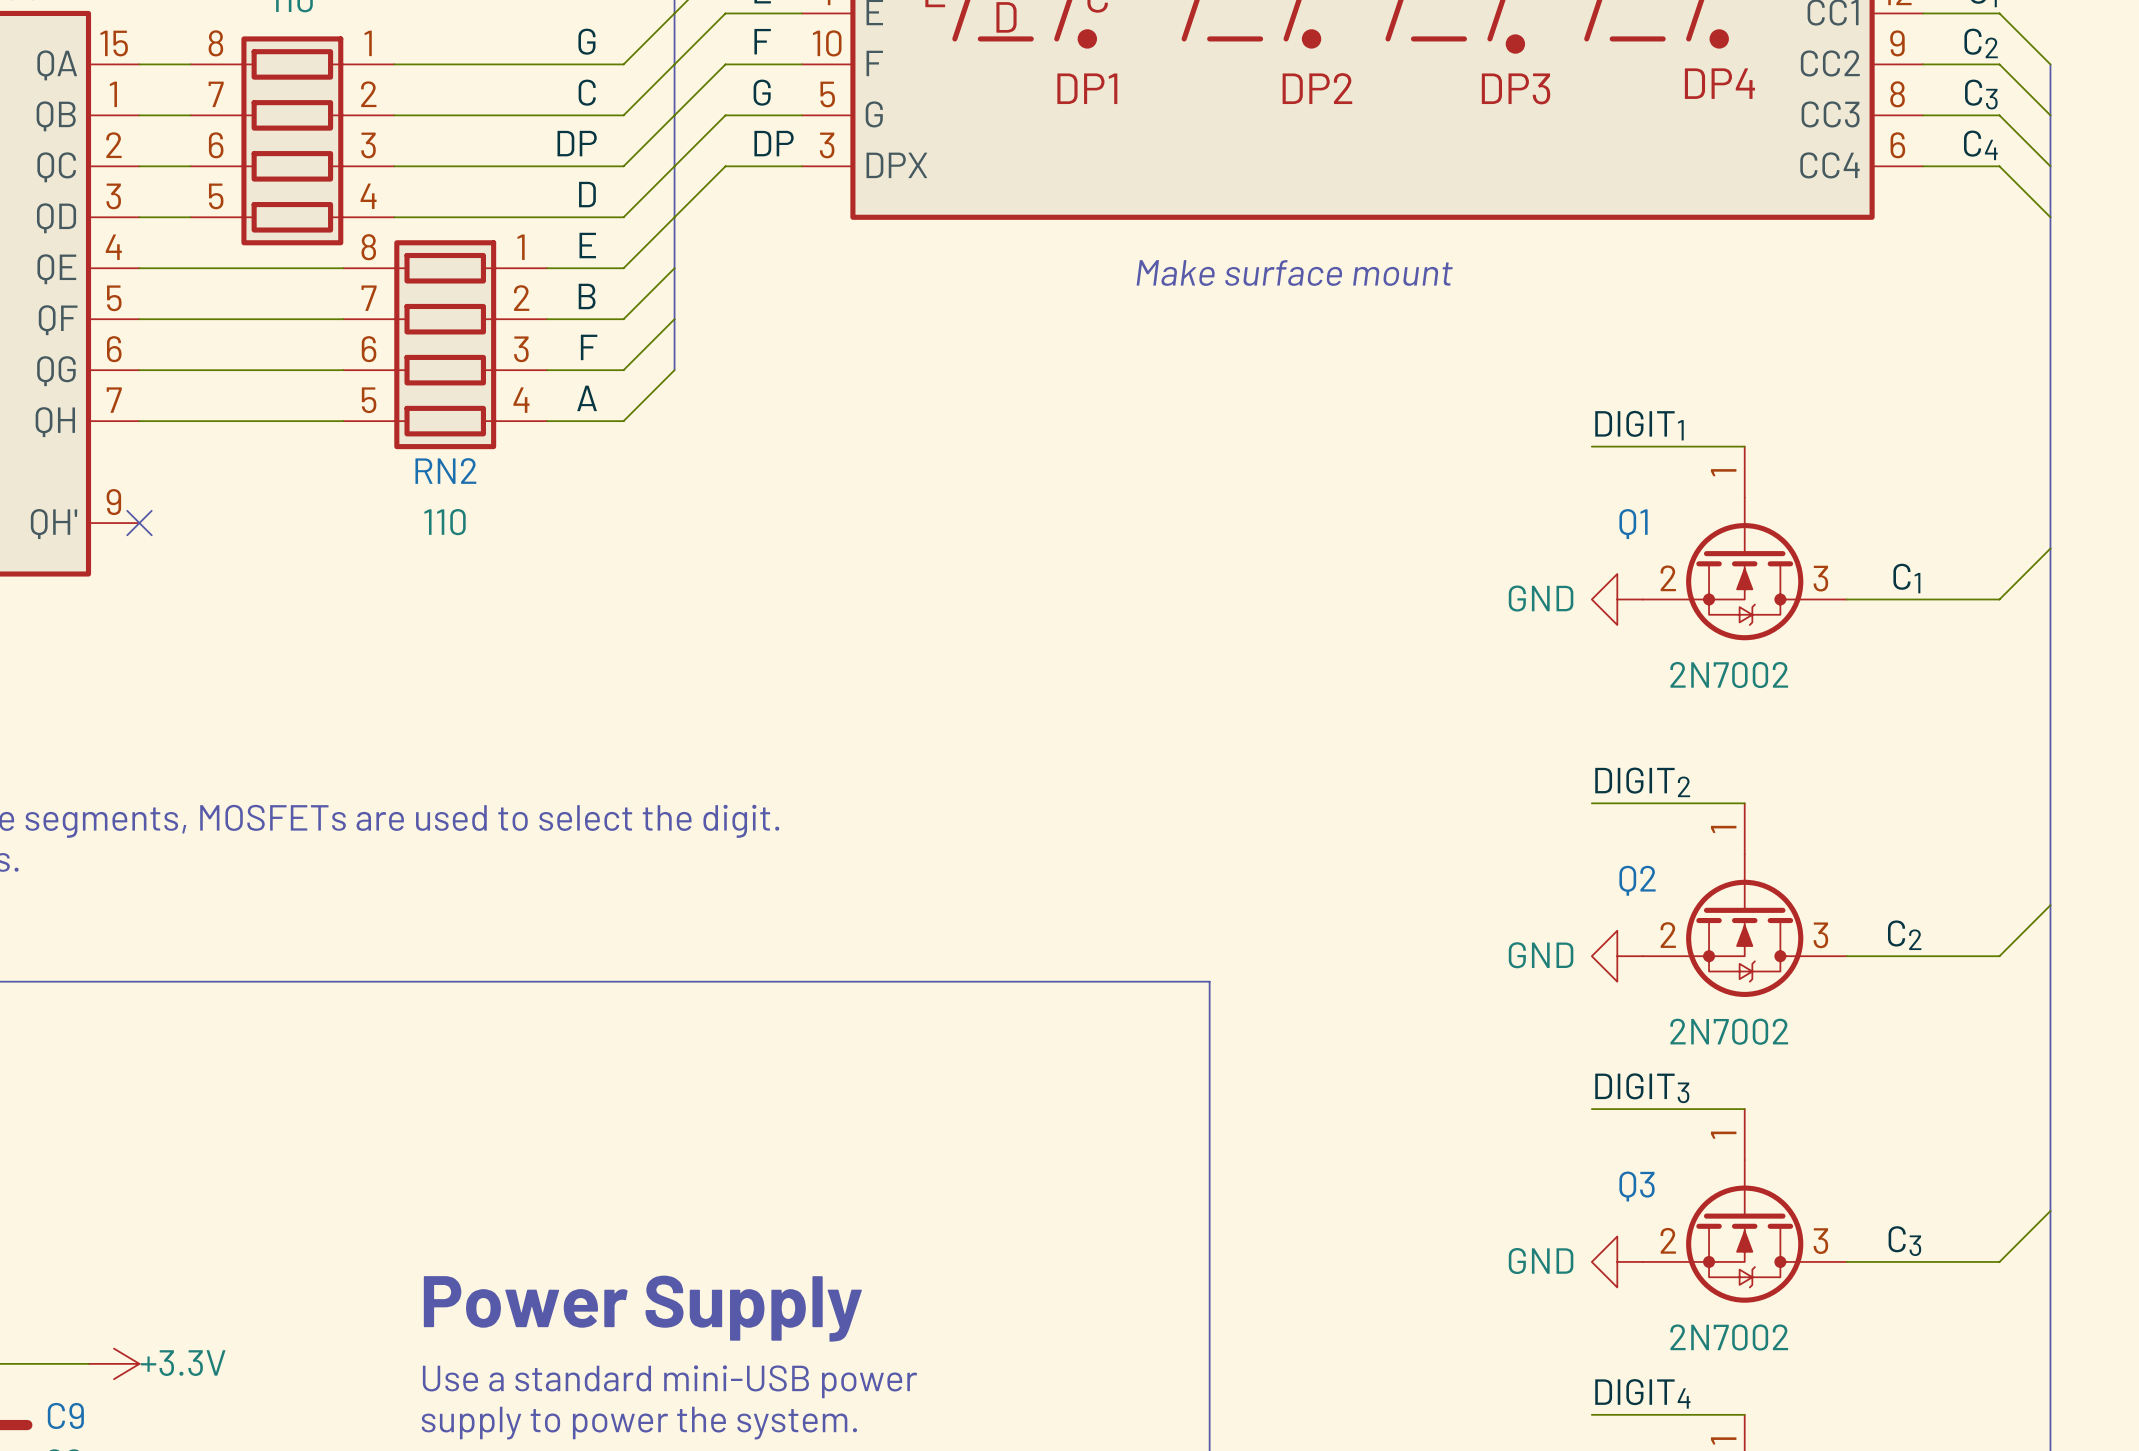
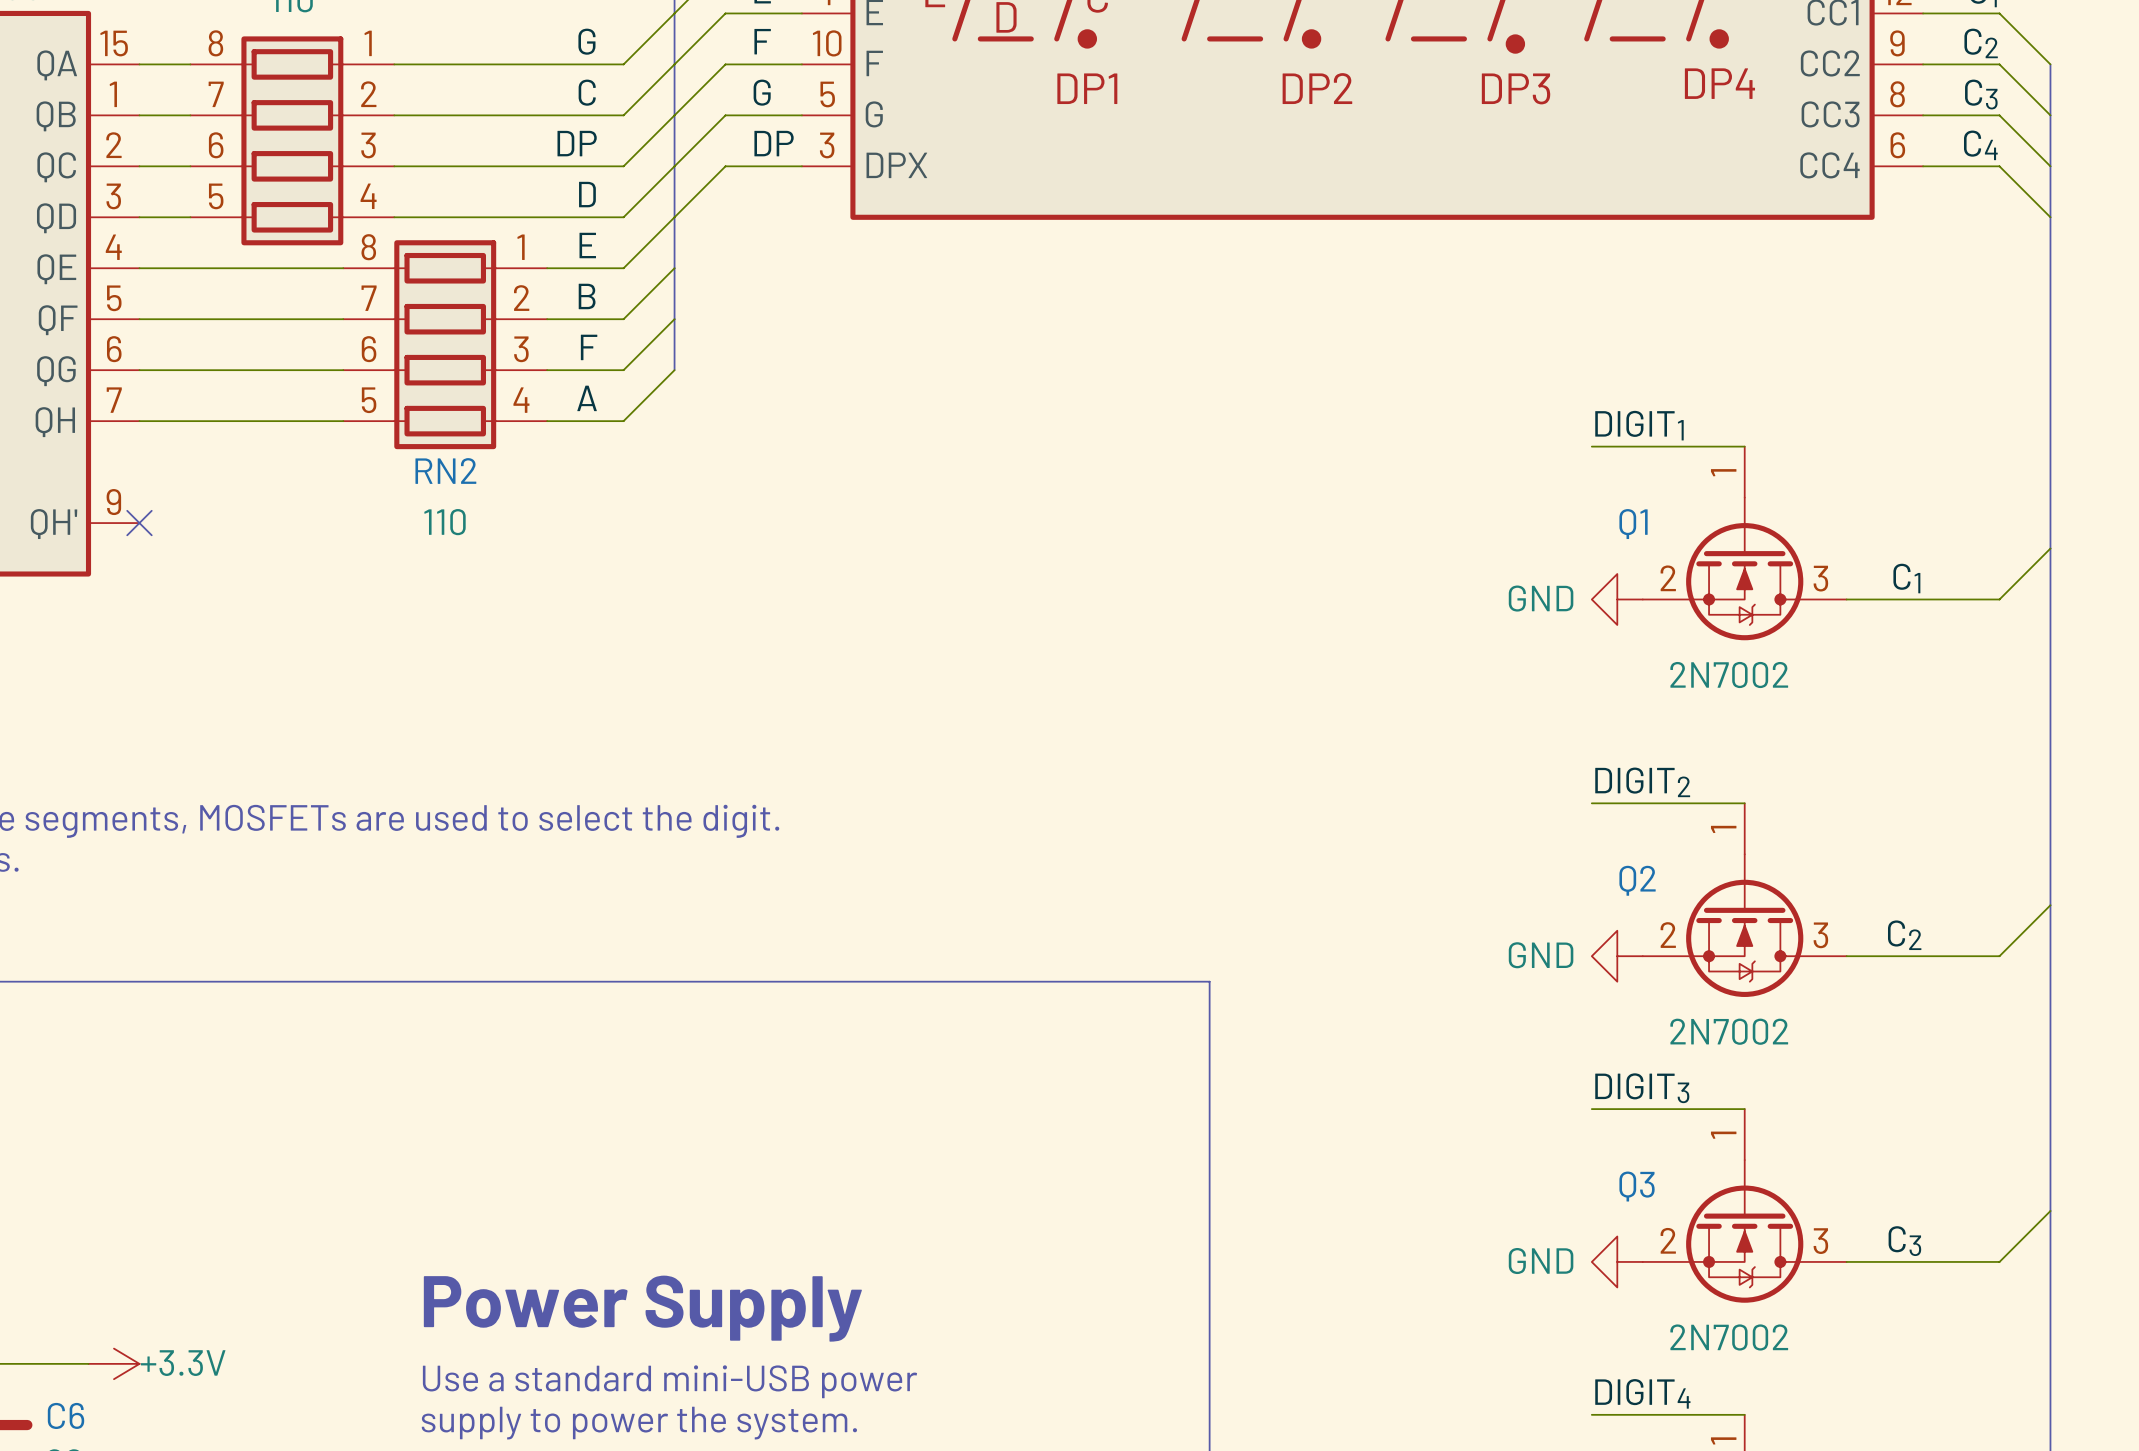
text: Make surface mount (1294, 273) -> none
C9 name: C9 (65, 1415) -> C6 (66, 1415)

